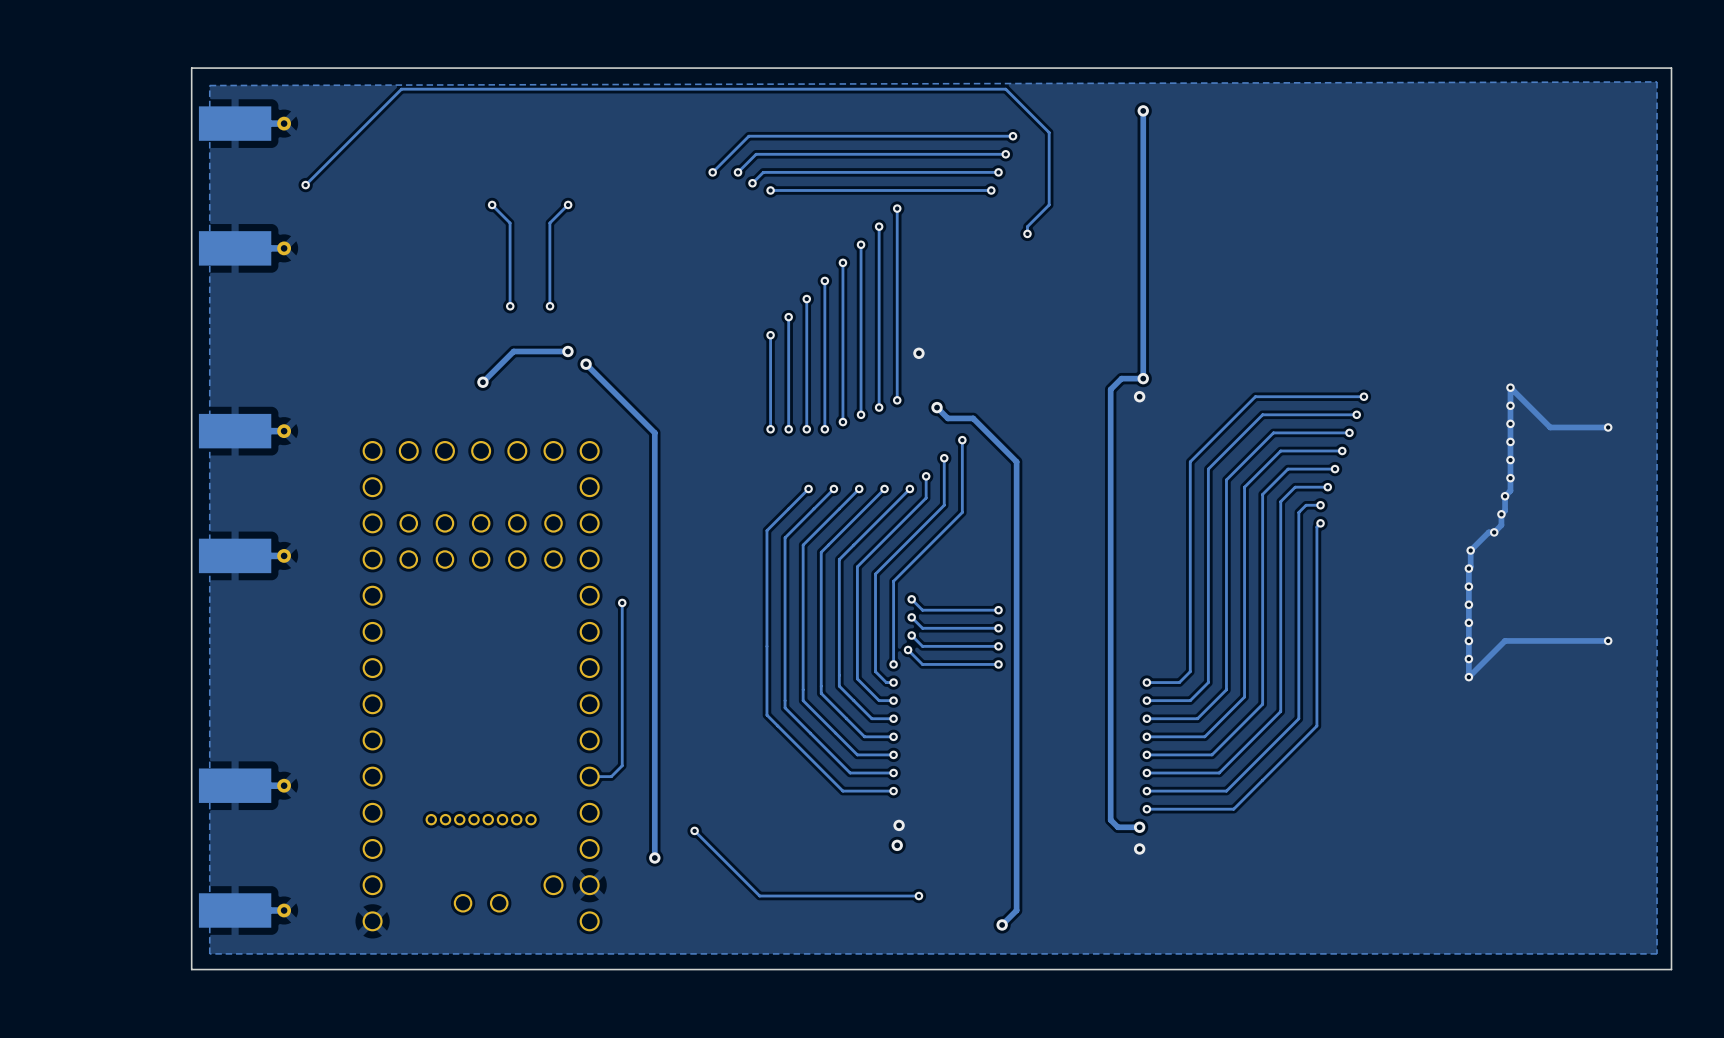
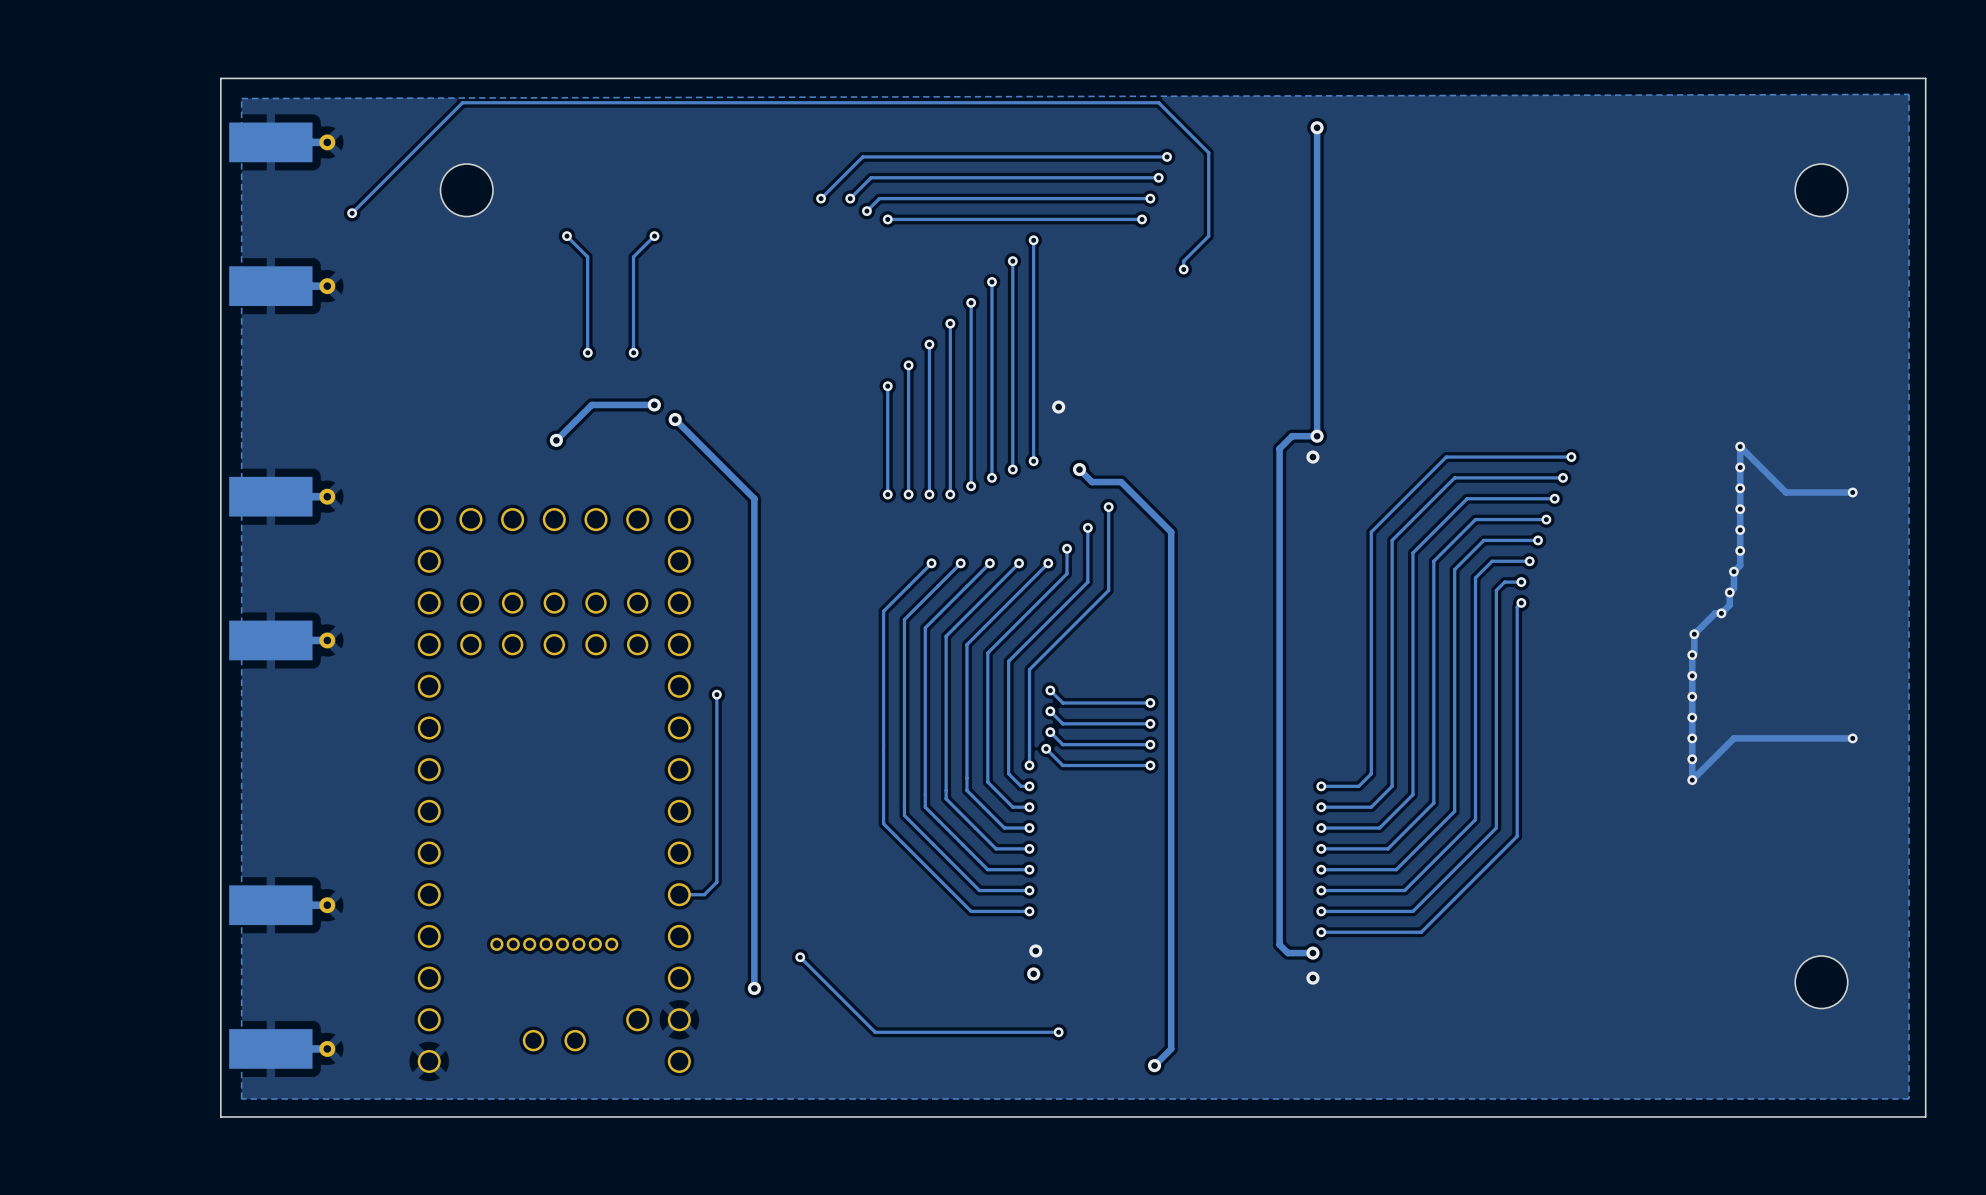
part: none -> (466, 190)
part: none -> (1821, 190)
part: none -> (1821, 982)

